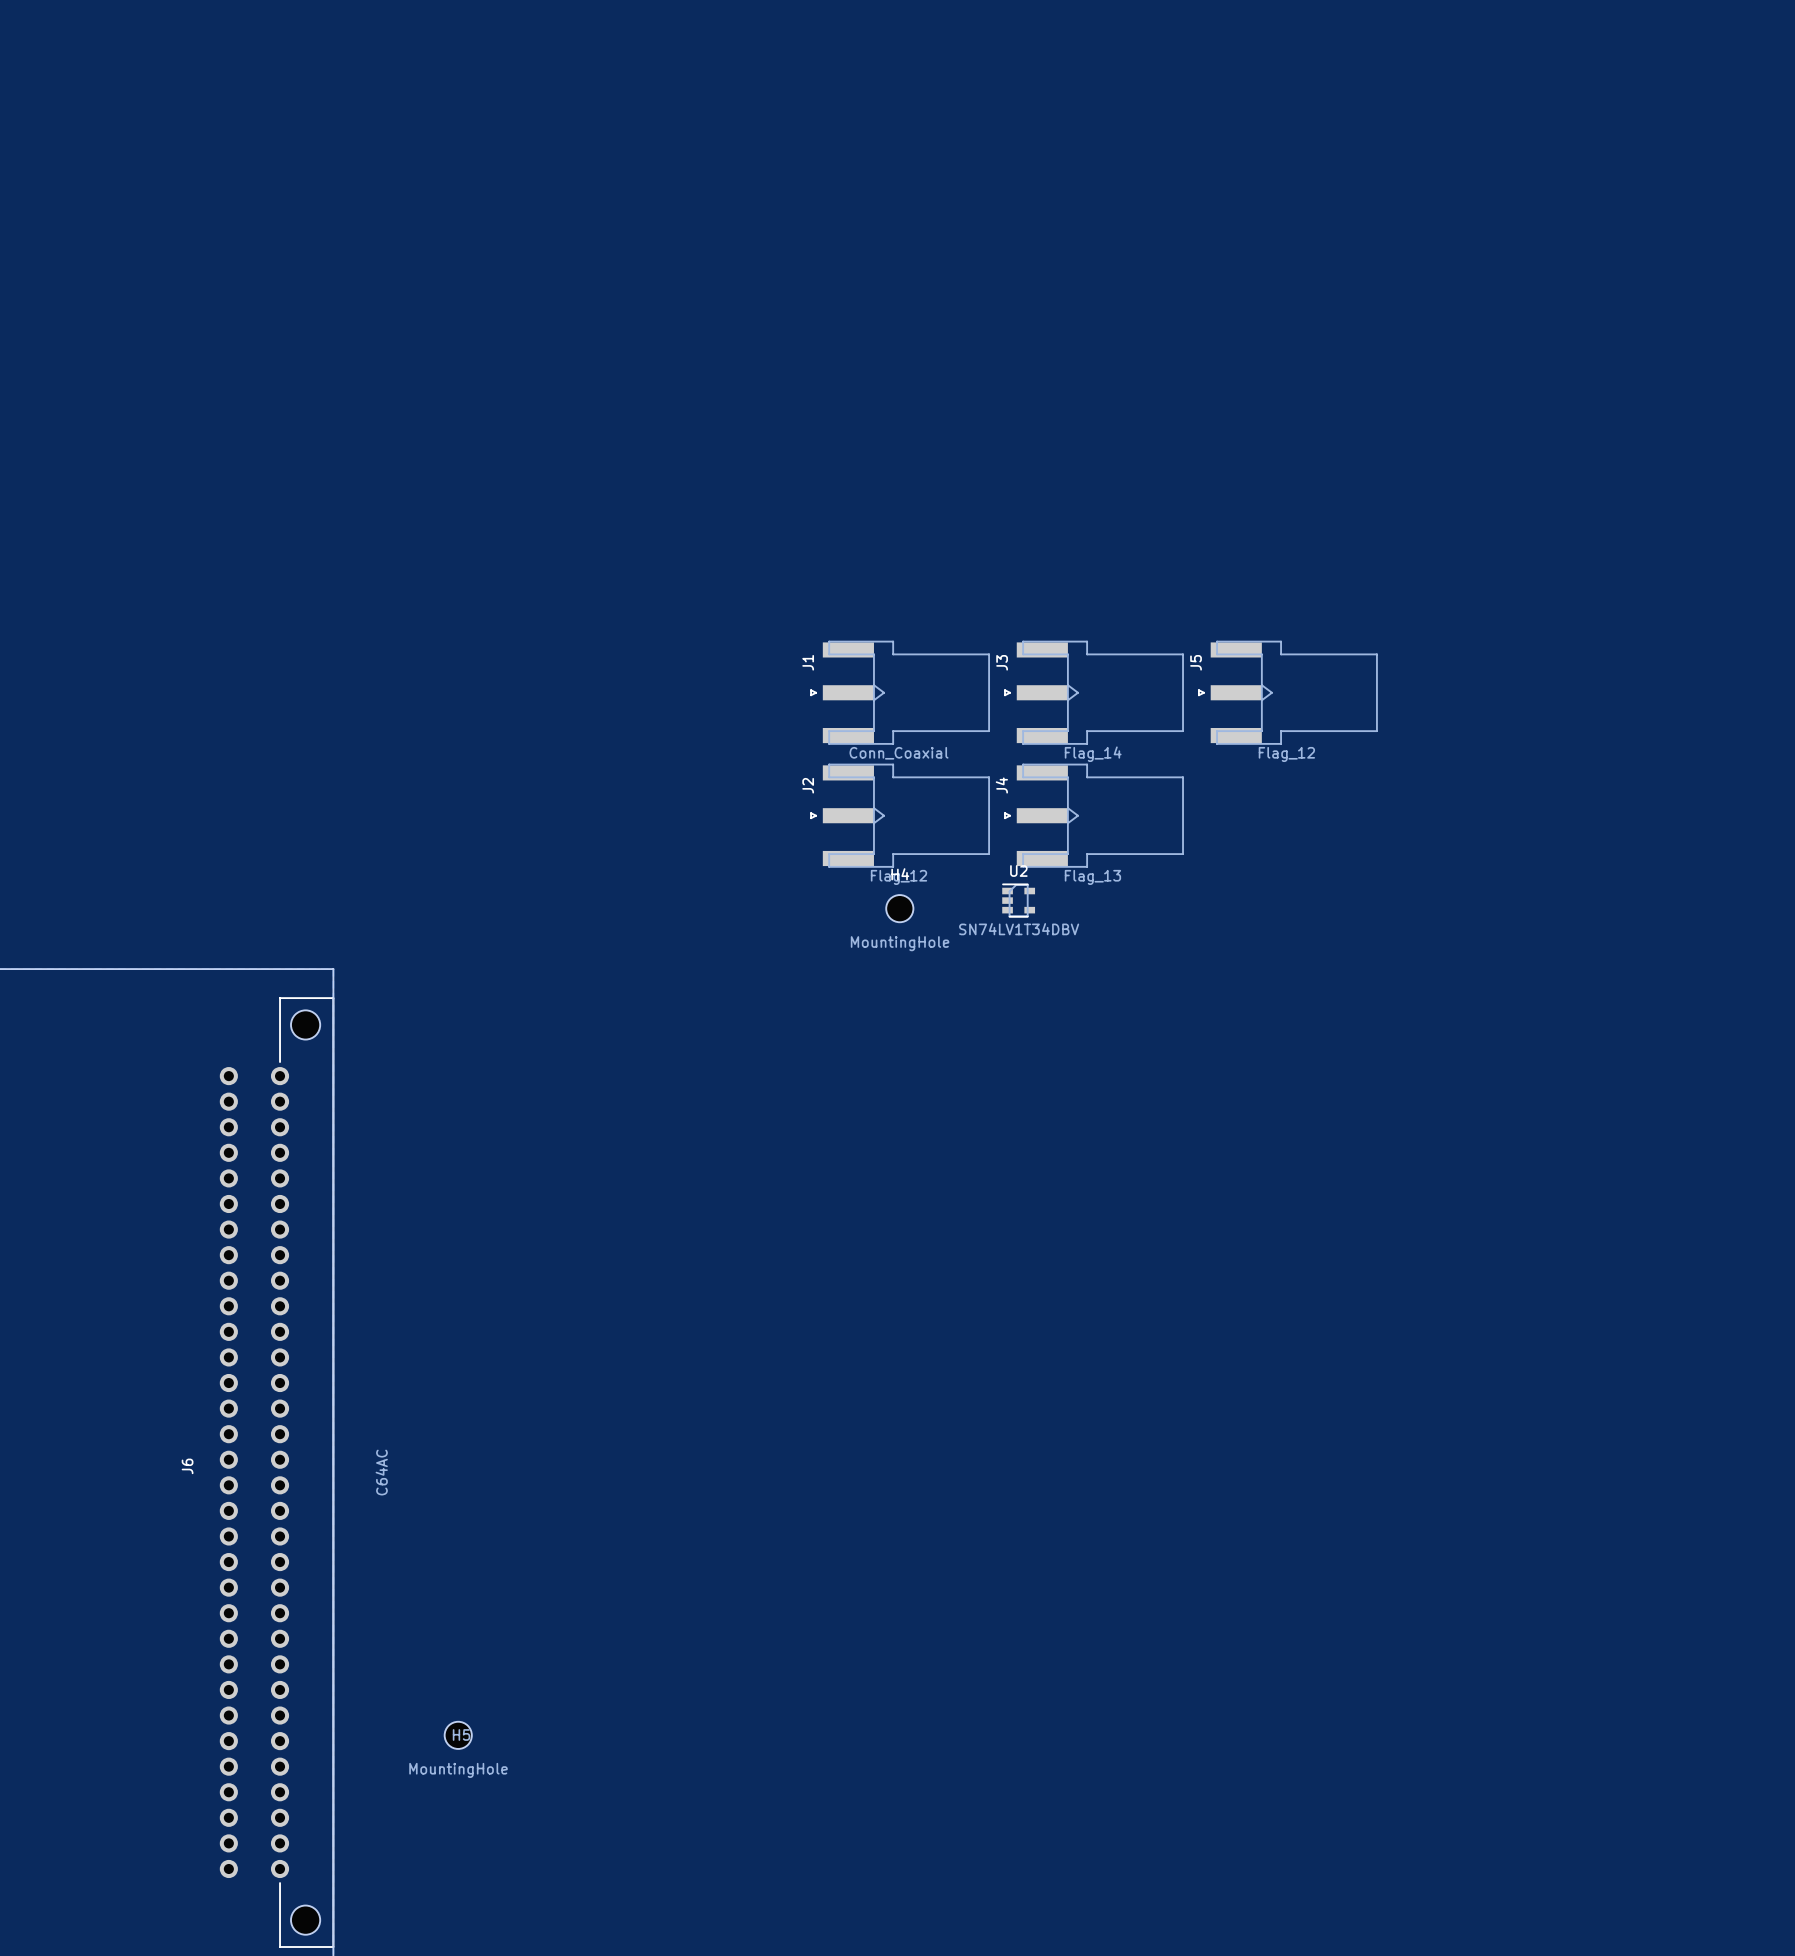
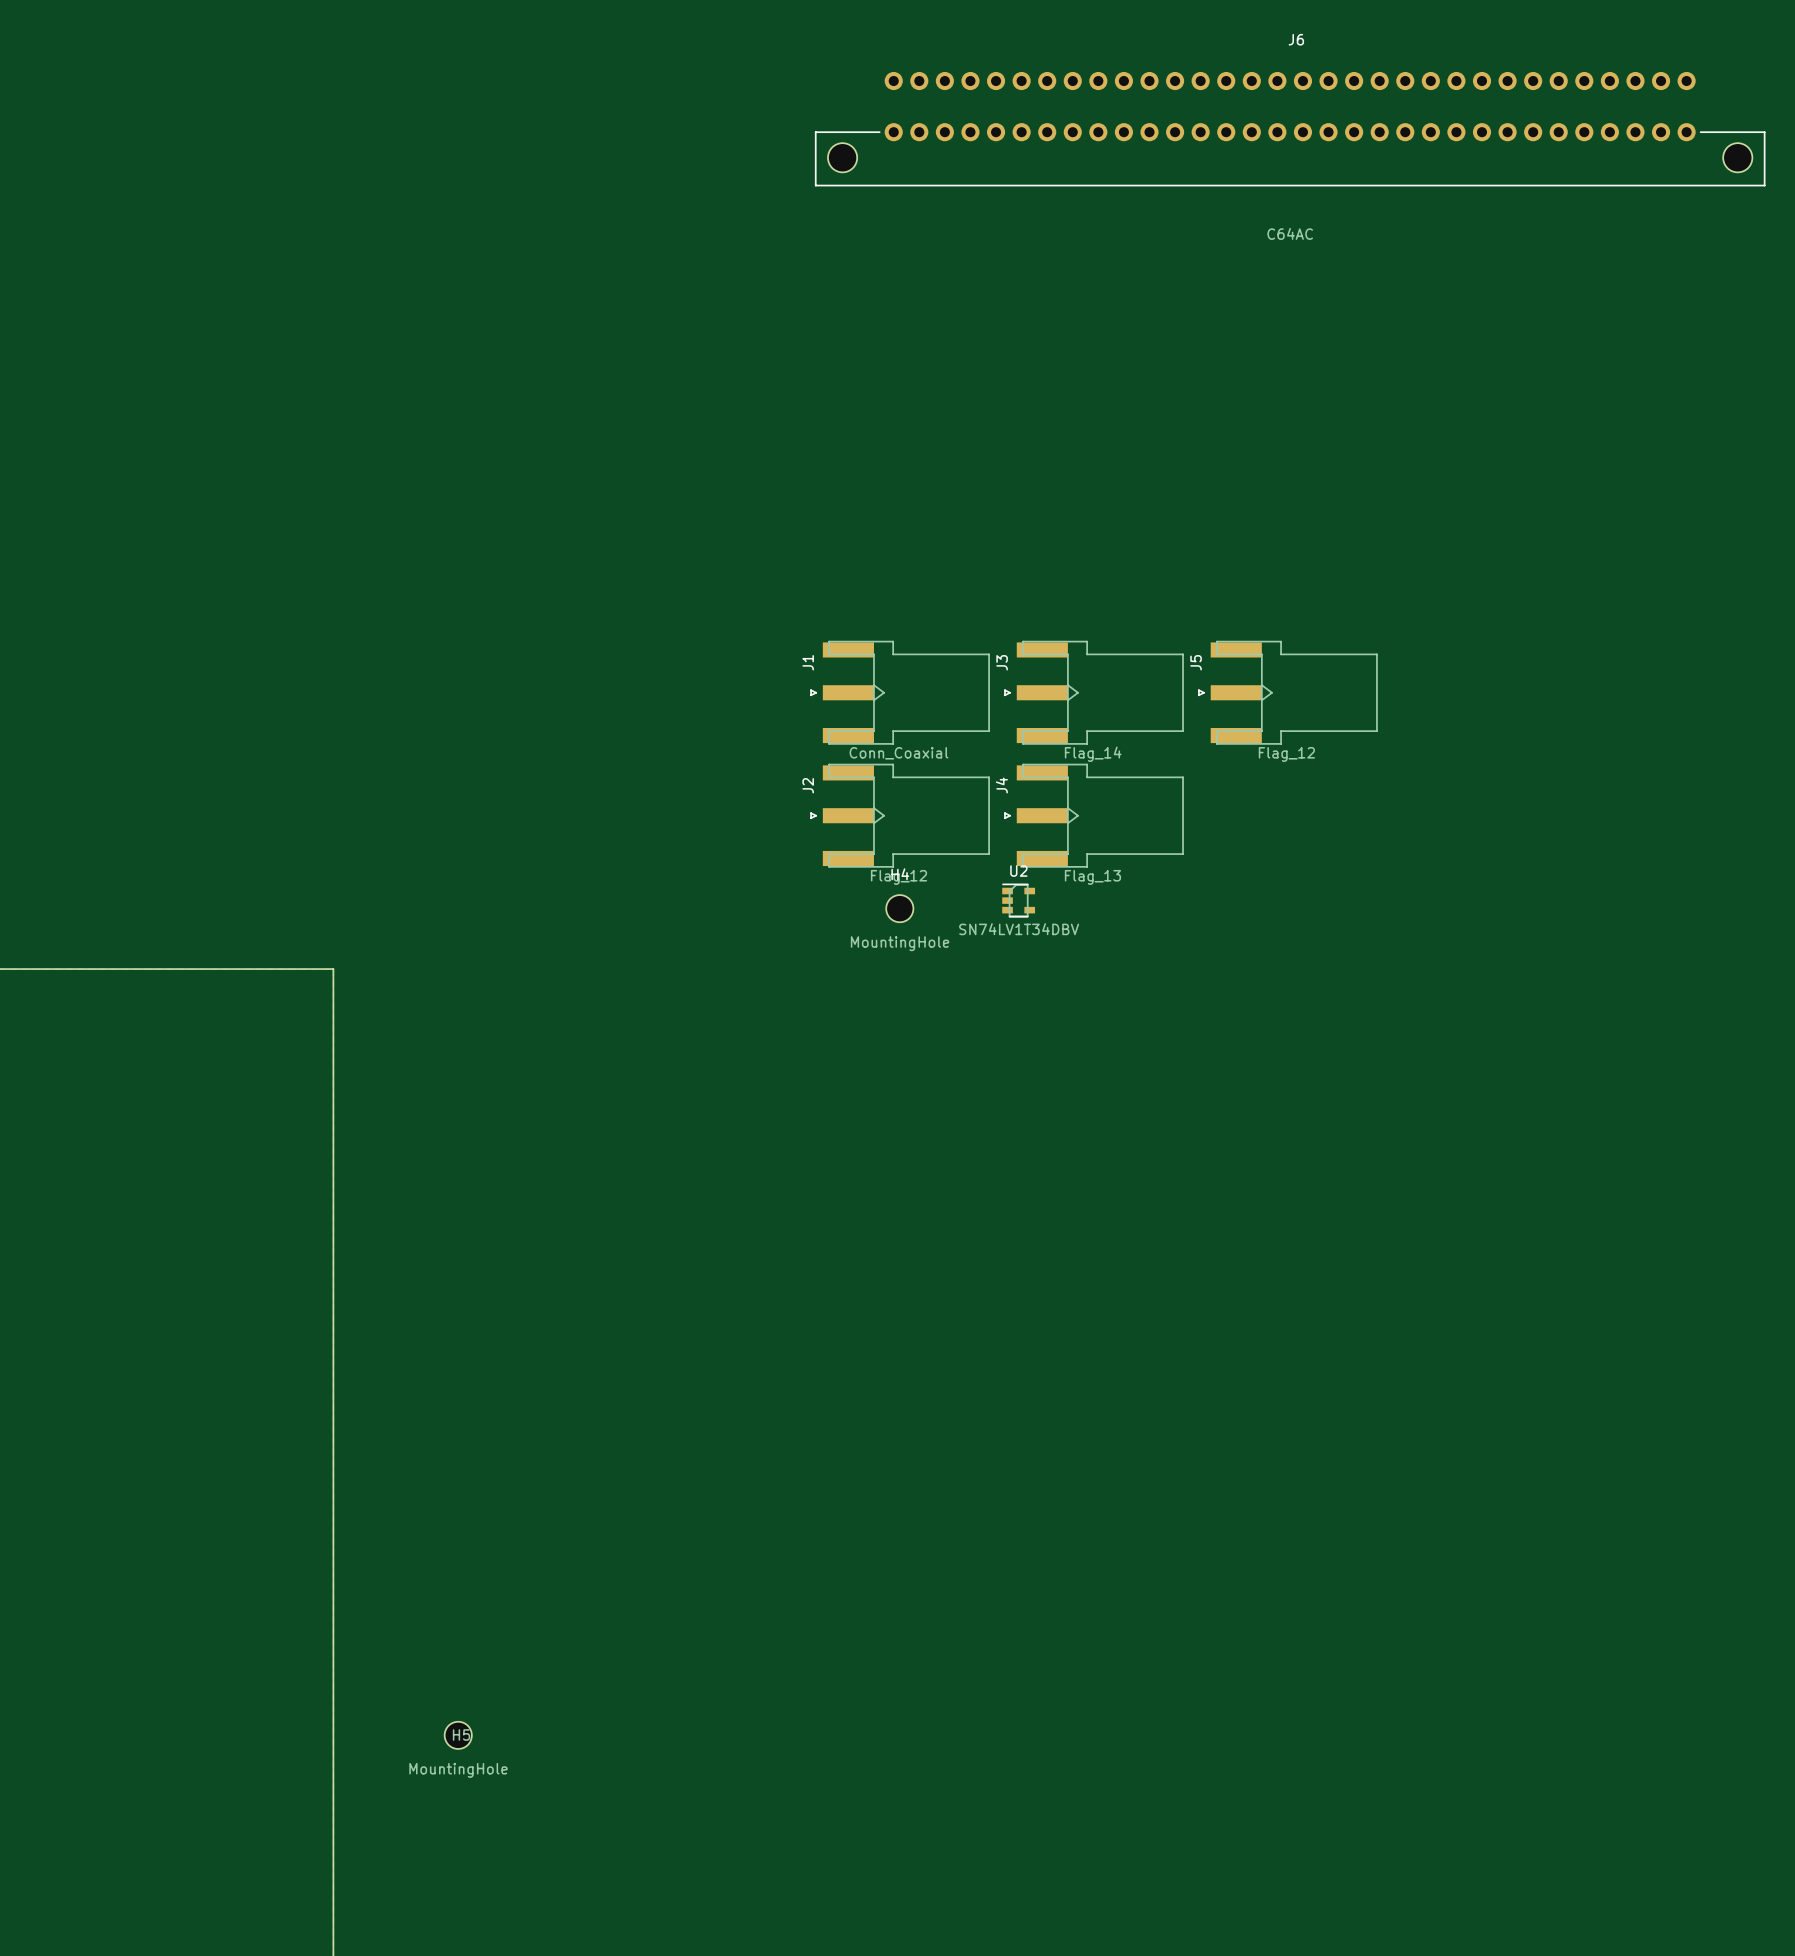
J6 rotation: 0° (276, 1472) -> 90° clockwise (1290, 129)
J6 position: (276, 1472) -> (1290, 129)

